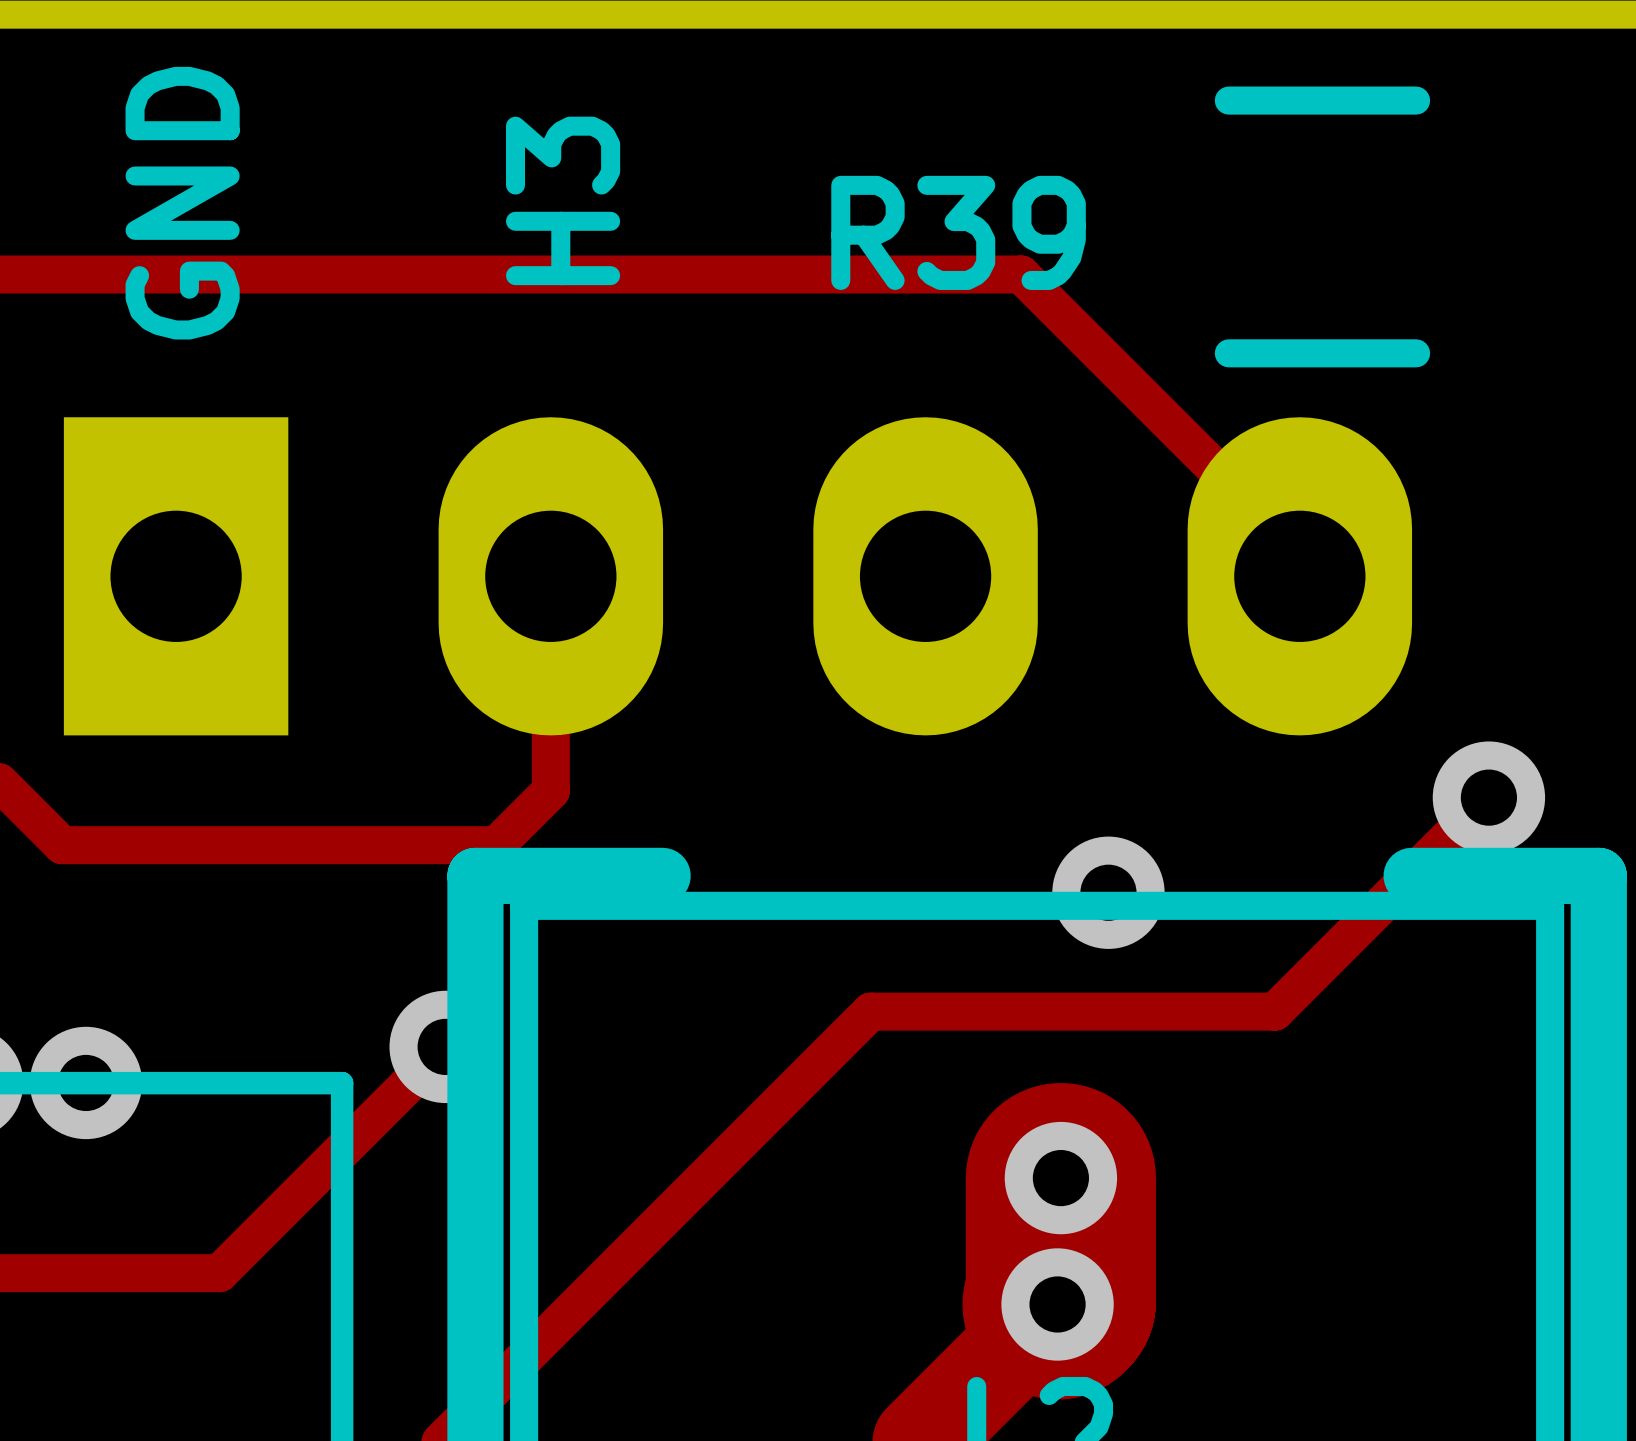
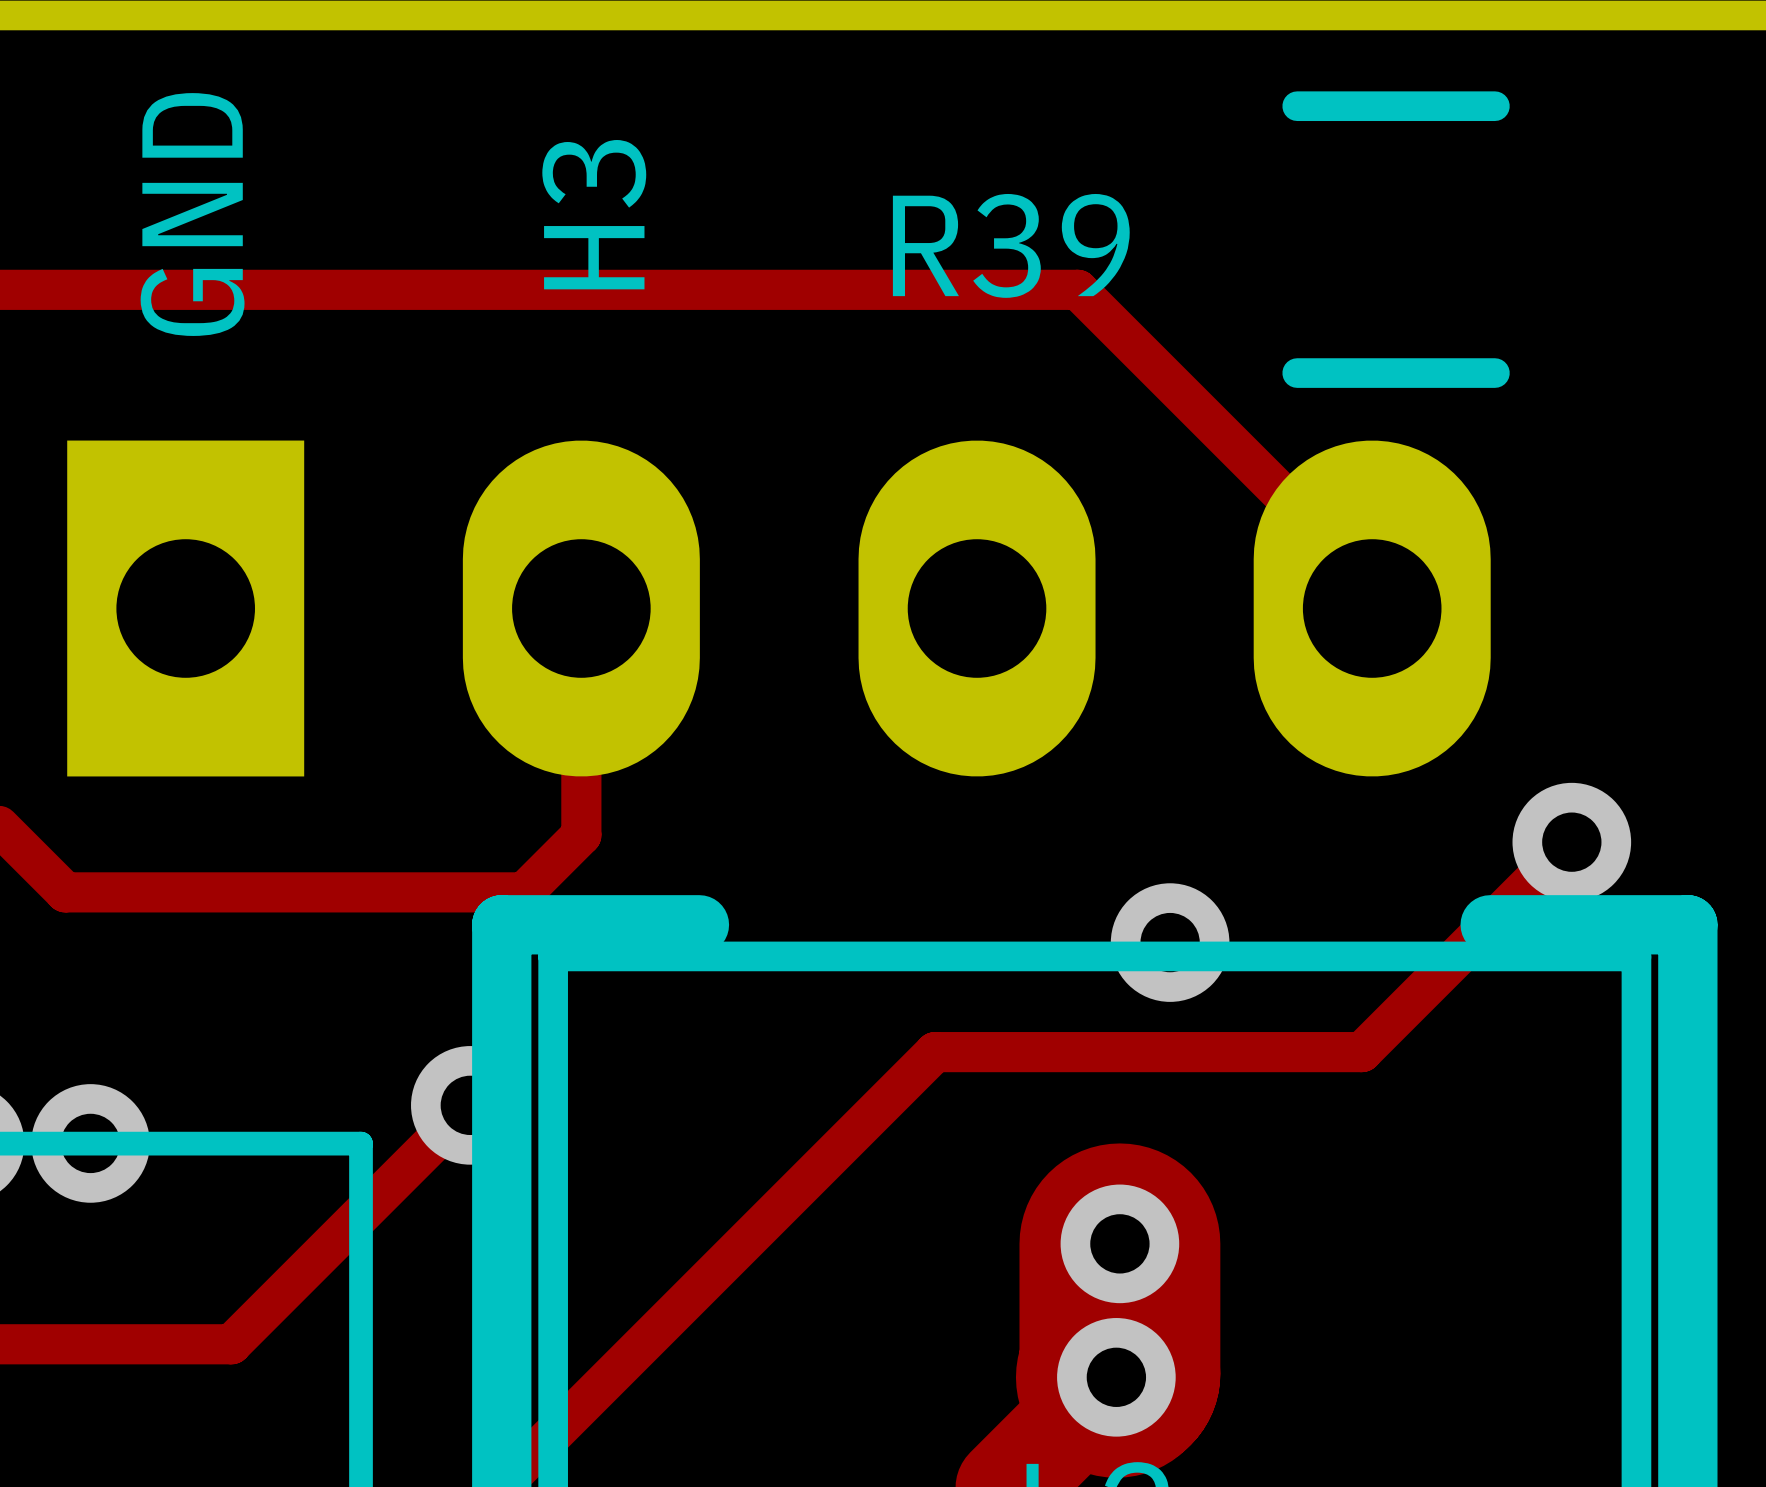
track: (1290, 996) (1274, 1011) (870, 1011) -> (1361, 1052) (935, 1052) (919, 1068)

